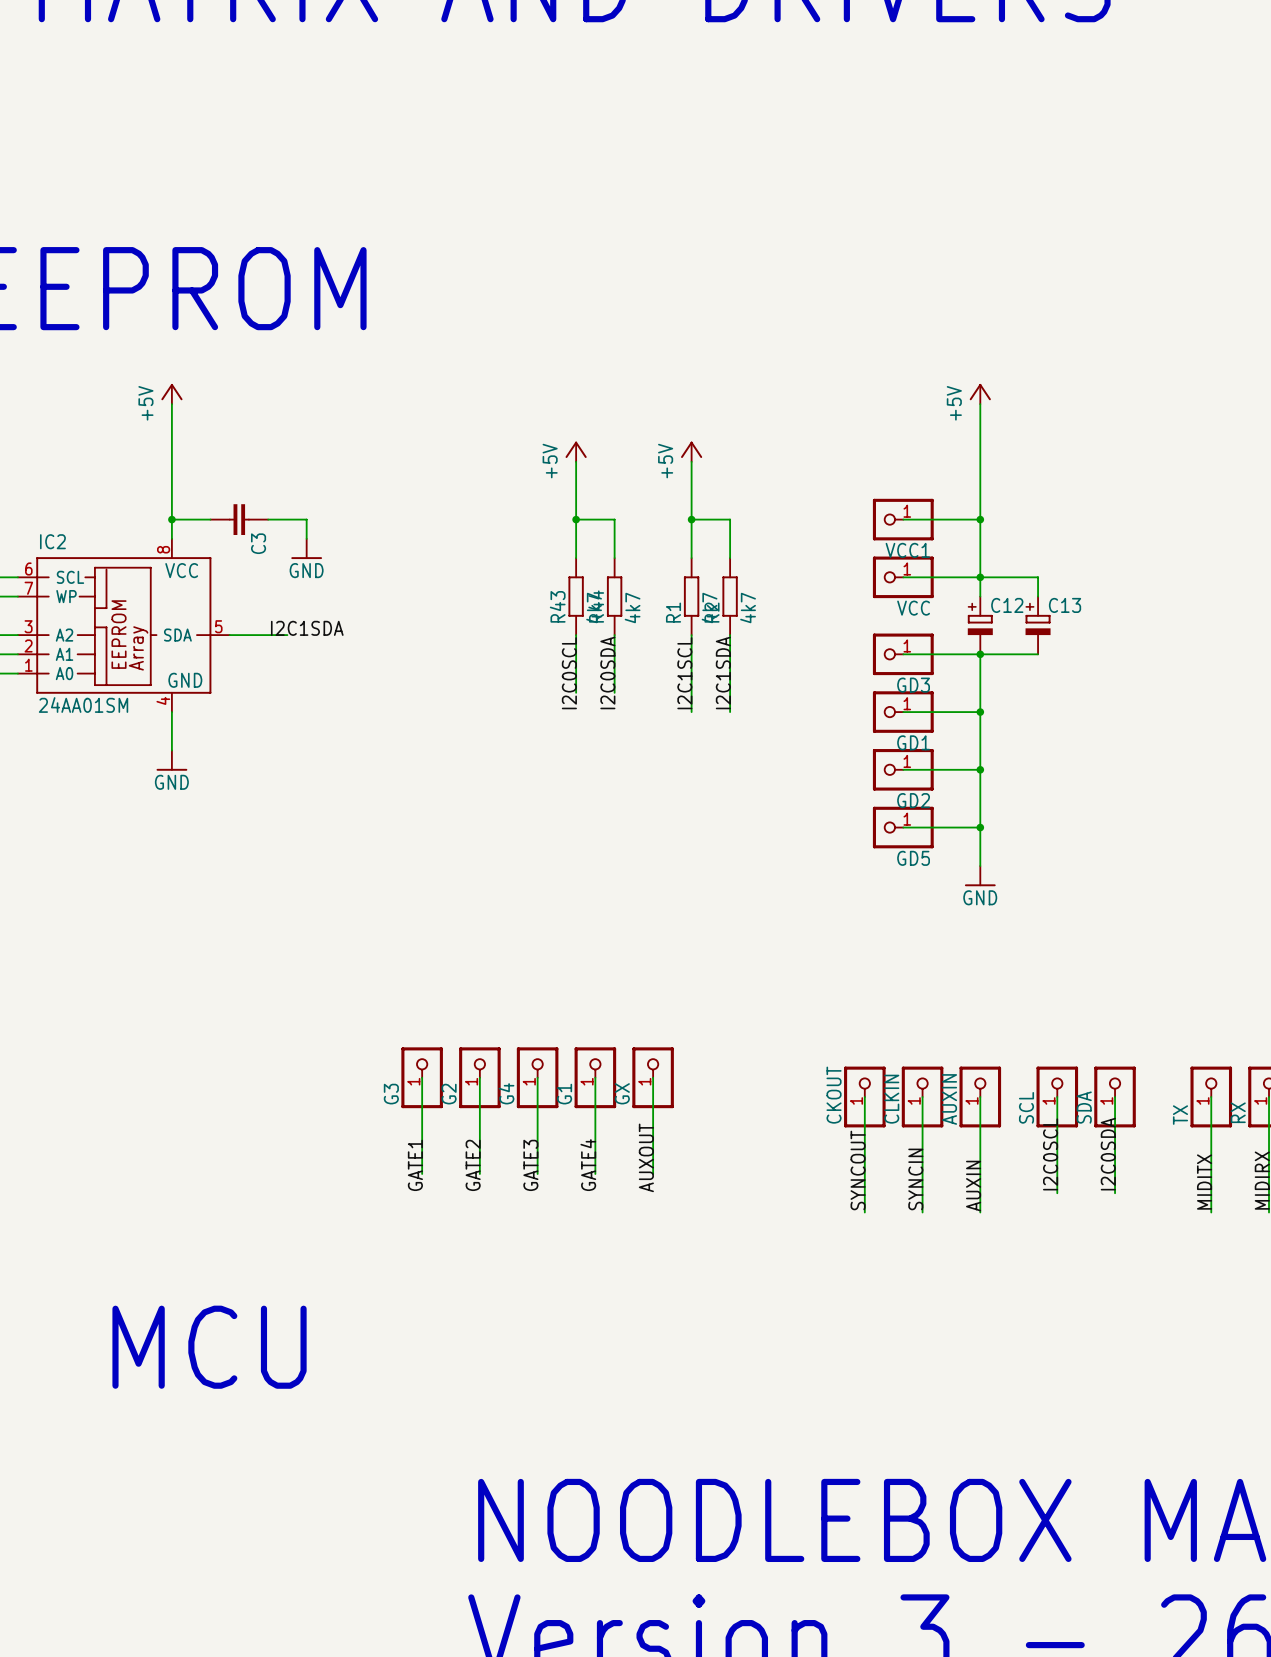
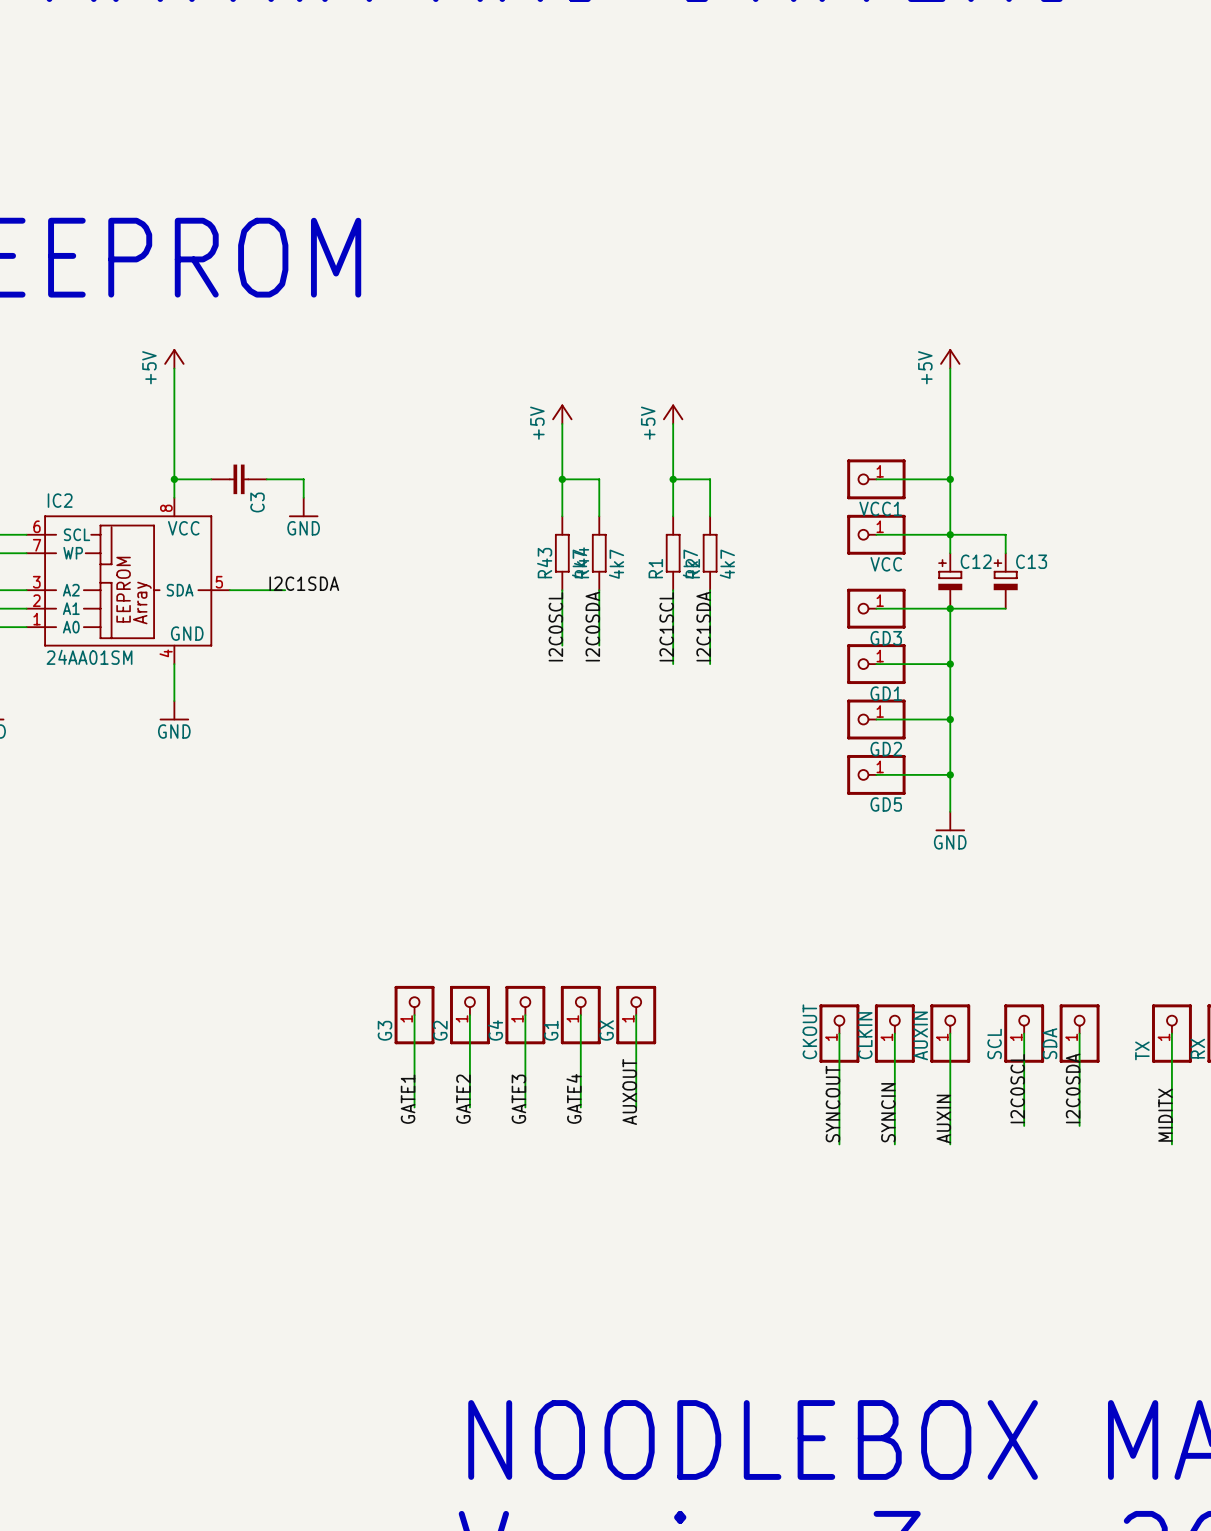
text: MCU (209, 1347) -> none

